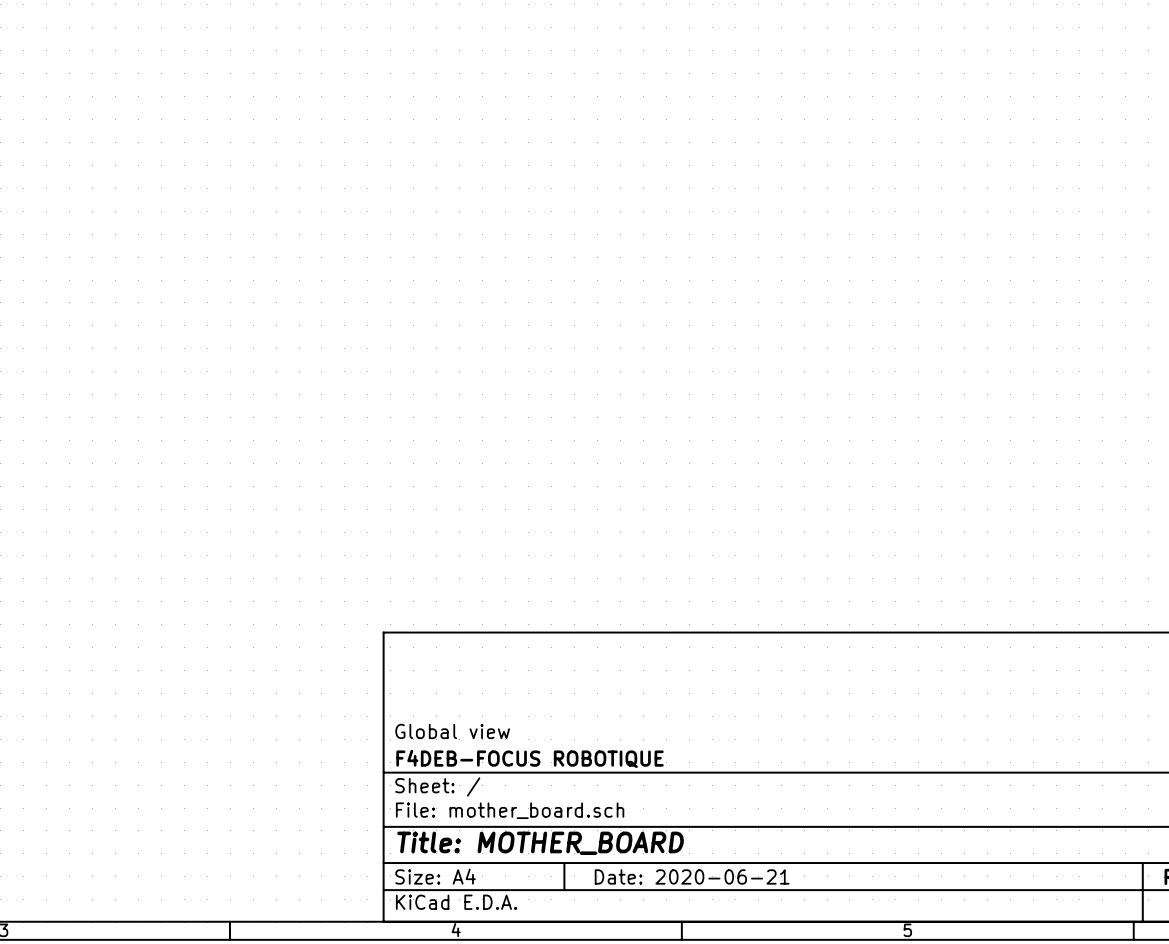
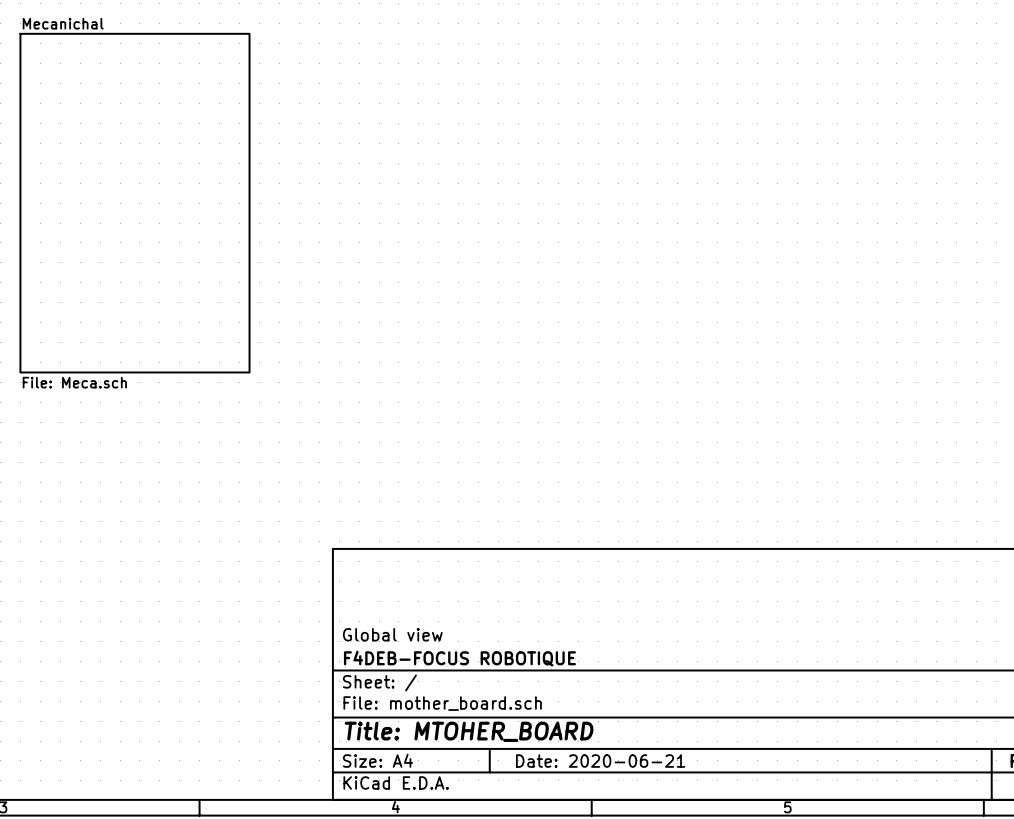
sheet Mecanichal: none -> File: Meca.sch (134, 203)
title block: Title: MOTHER_BOARD (540, 843) -> Title: MTOHER_BOARD (469, 731)

